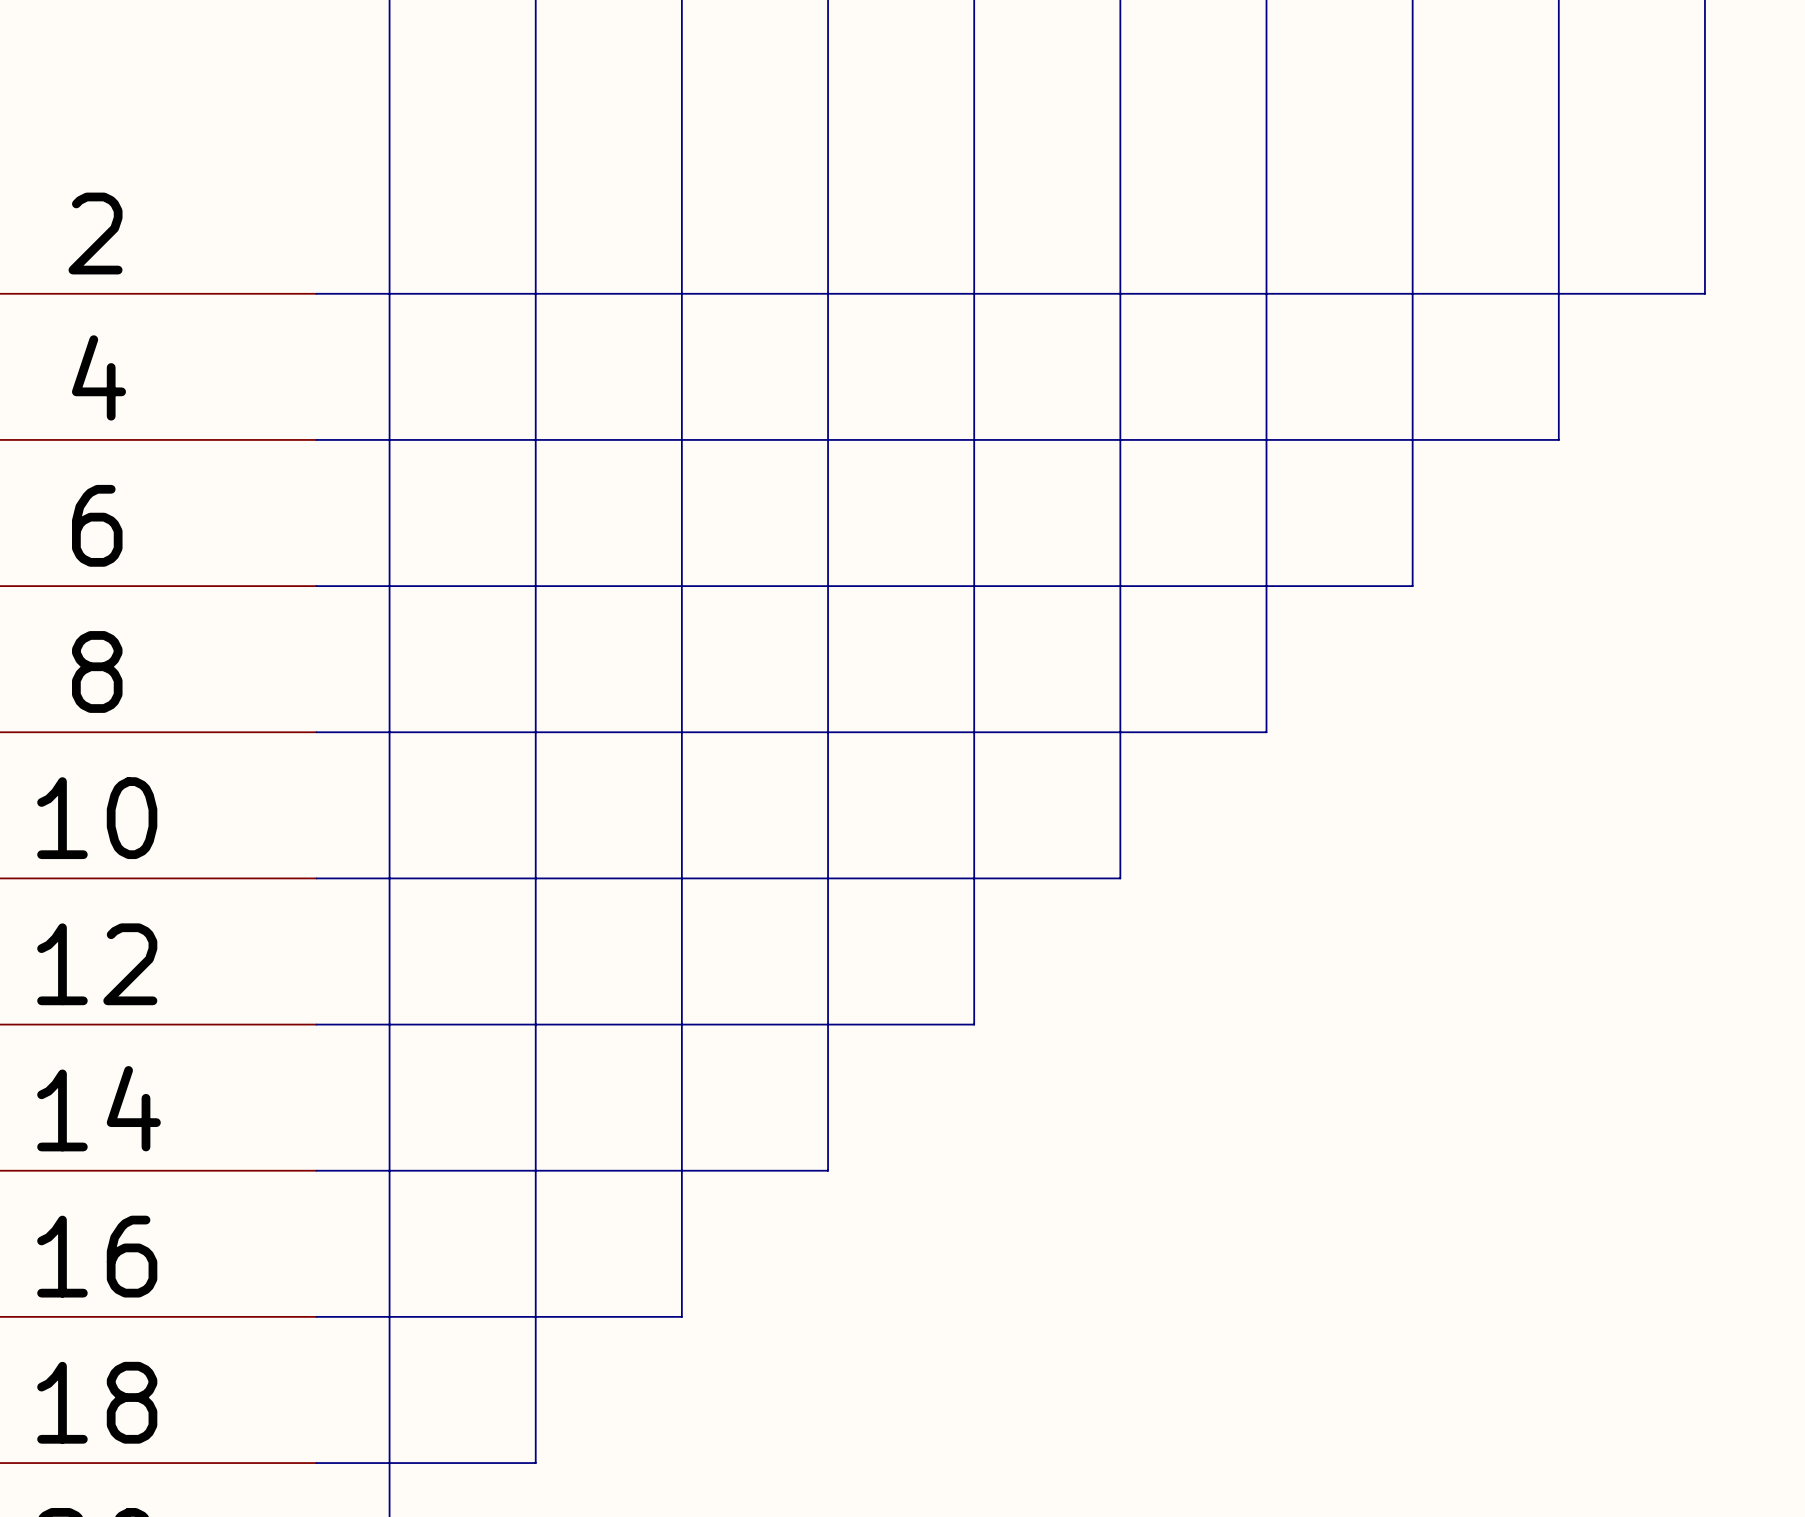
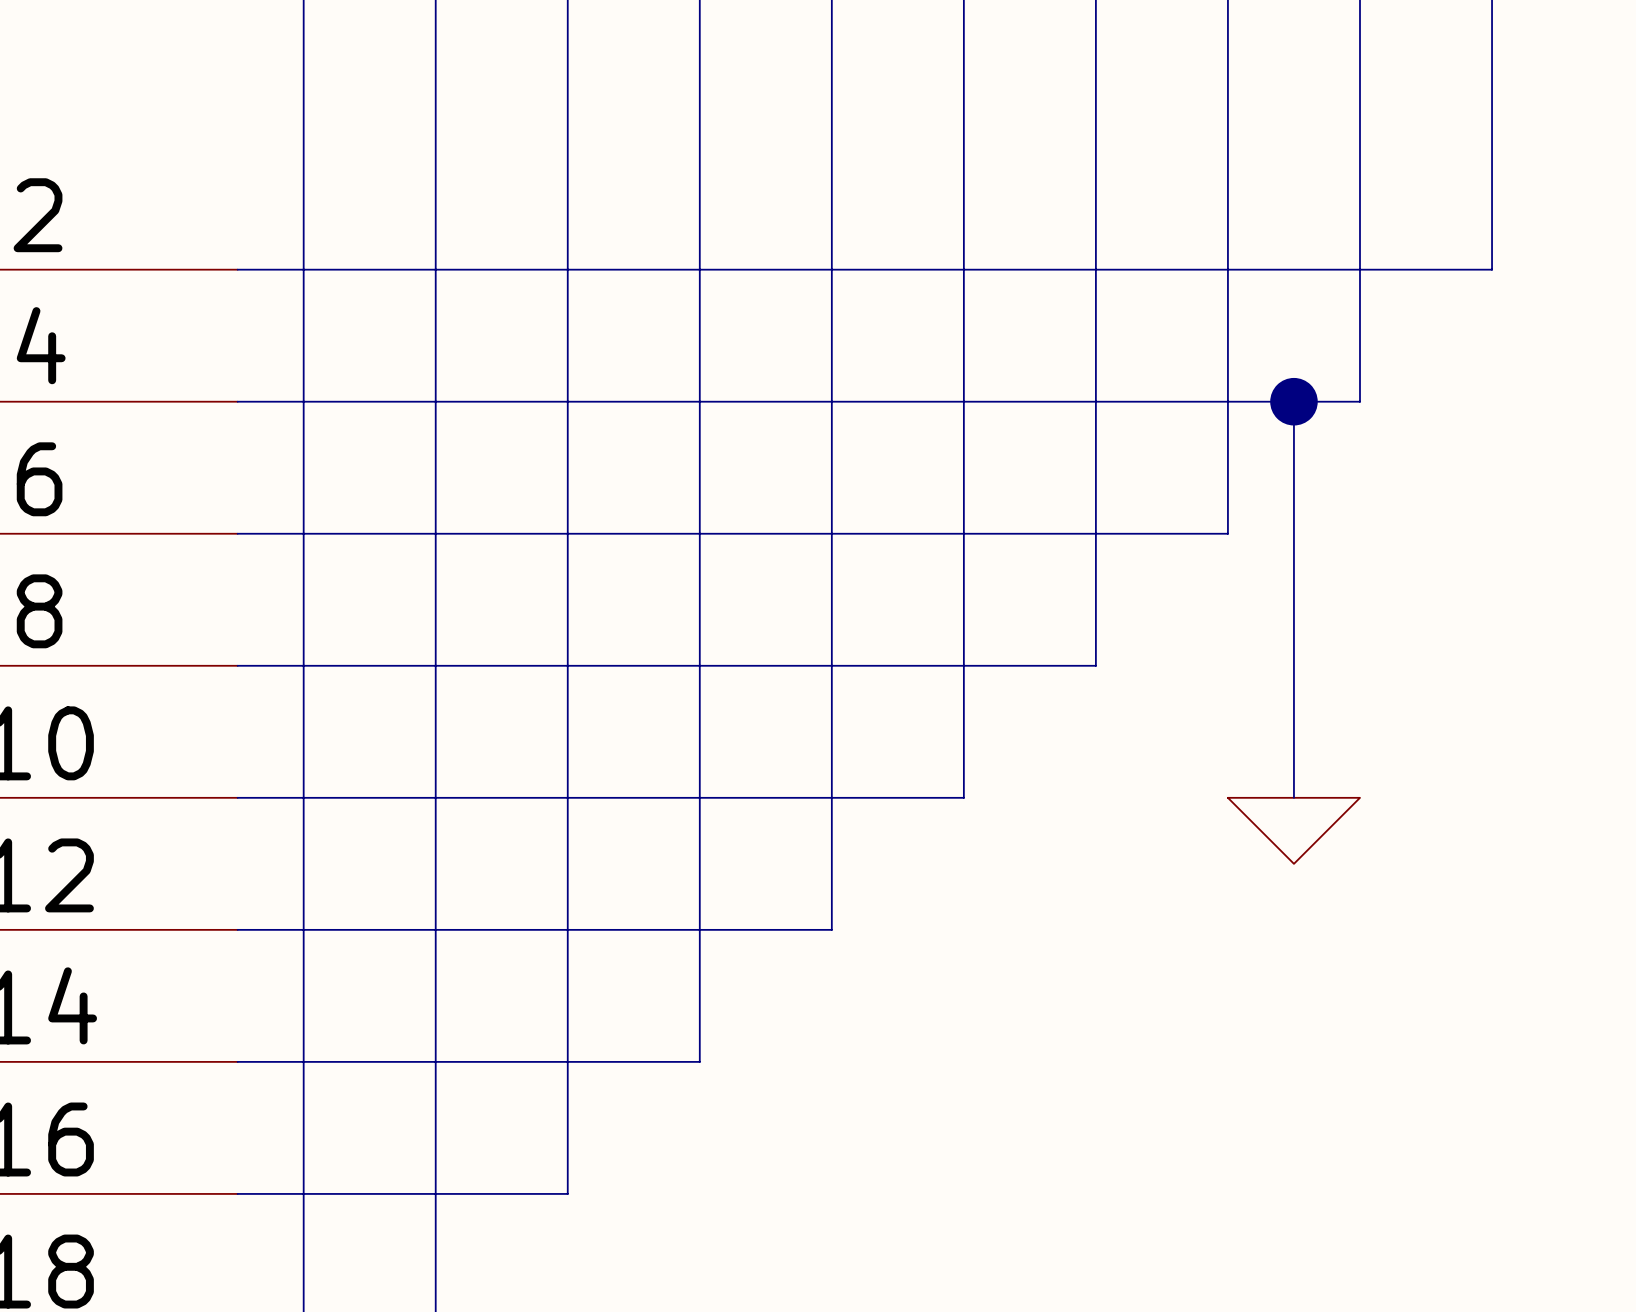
wire: none -> (1293, 401) (1293, 797)
junction: none -> (1293, 401)
power symbol: none -> (1293, 830)

